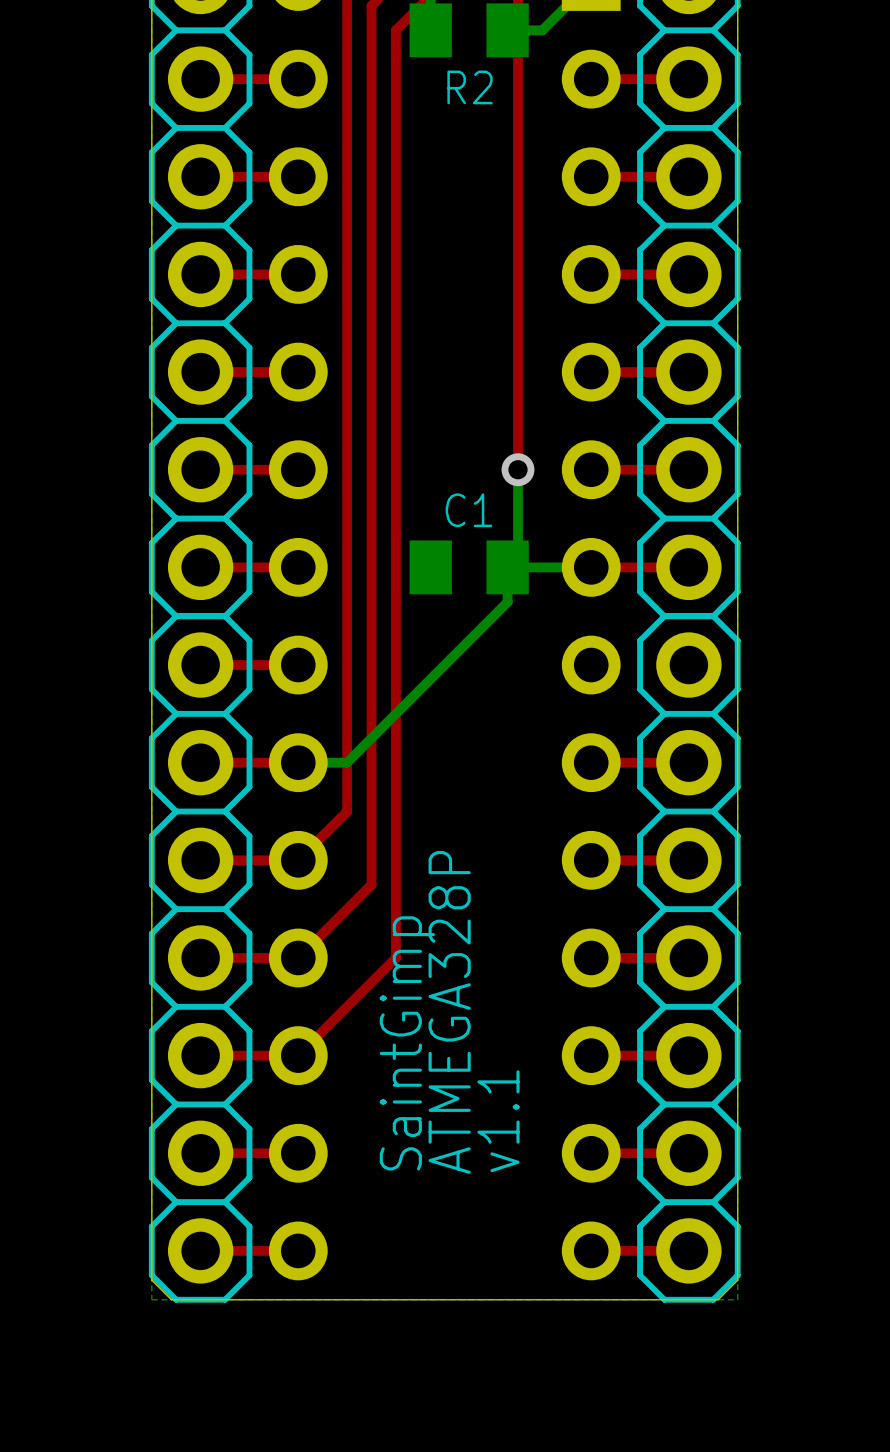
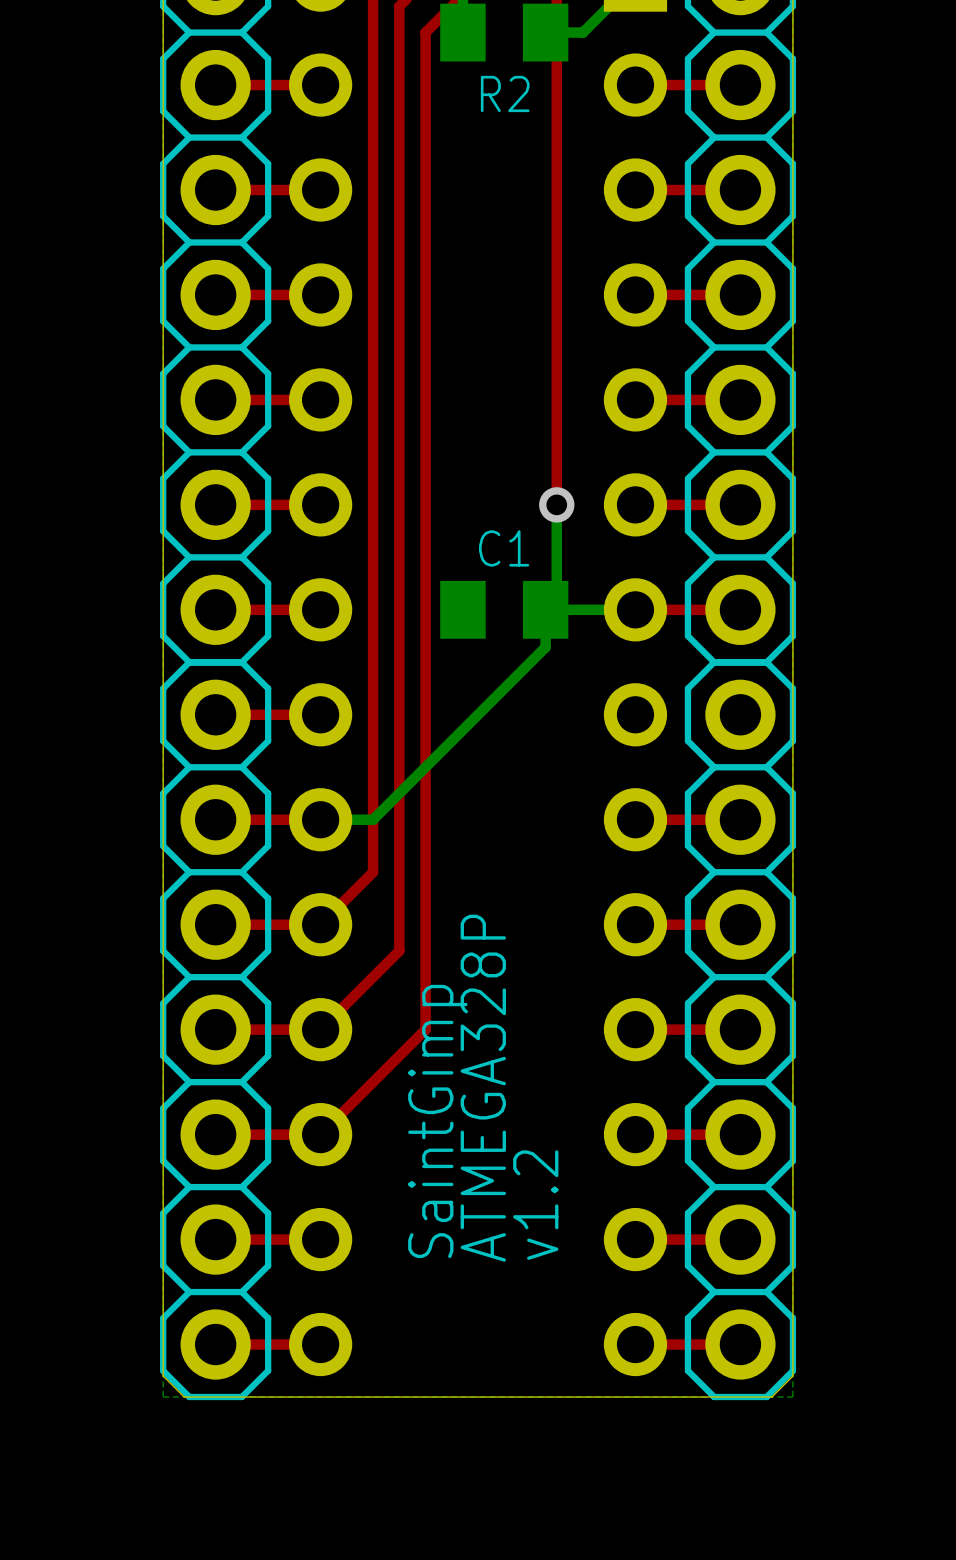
text: v1.1 (498, 1121) -> v1.2 (535, 1205)

